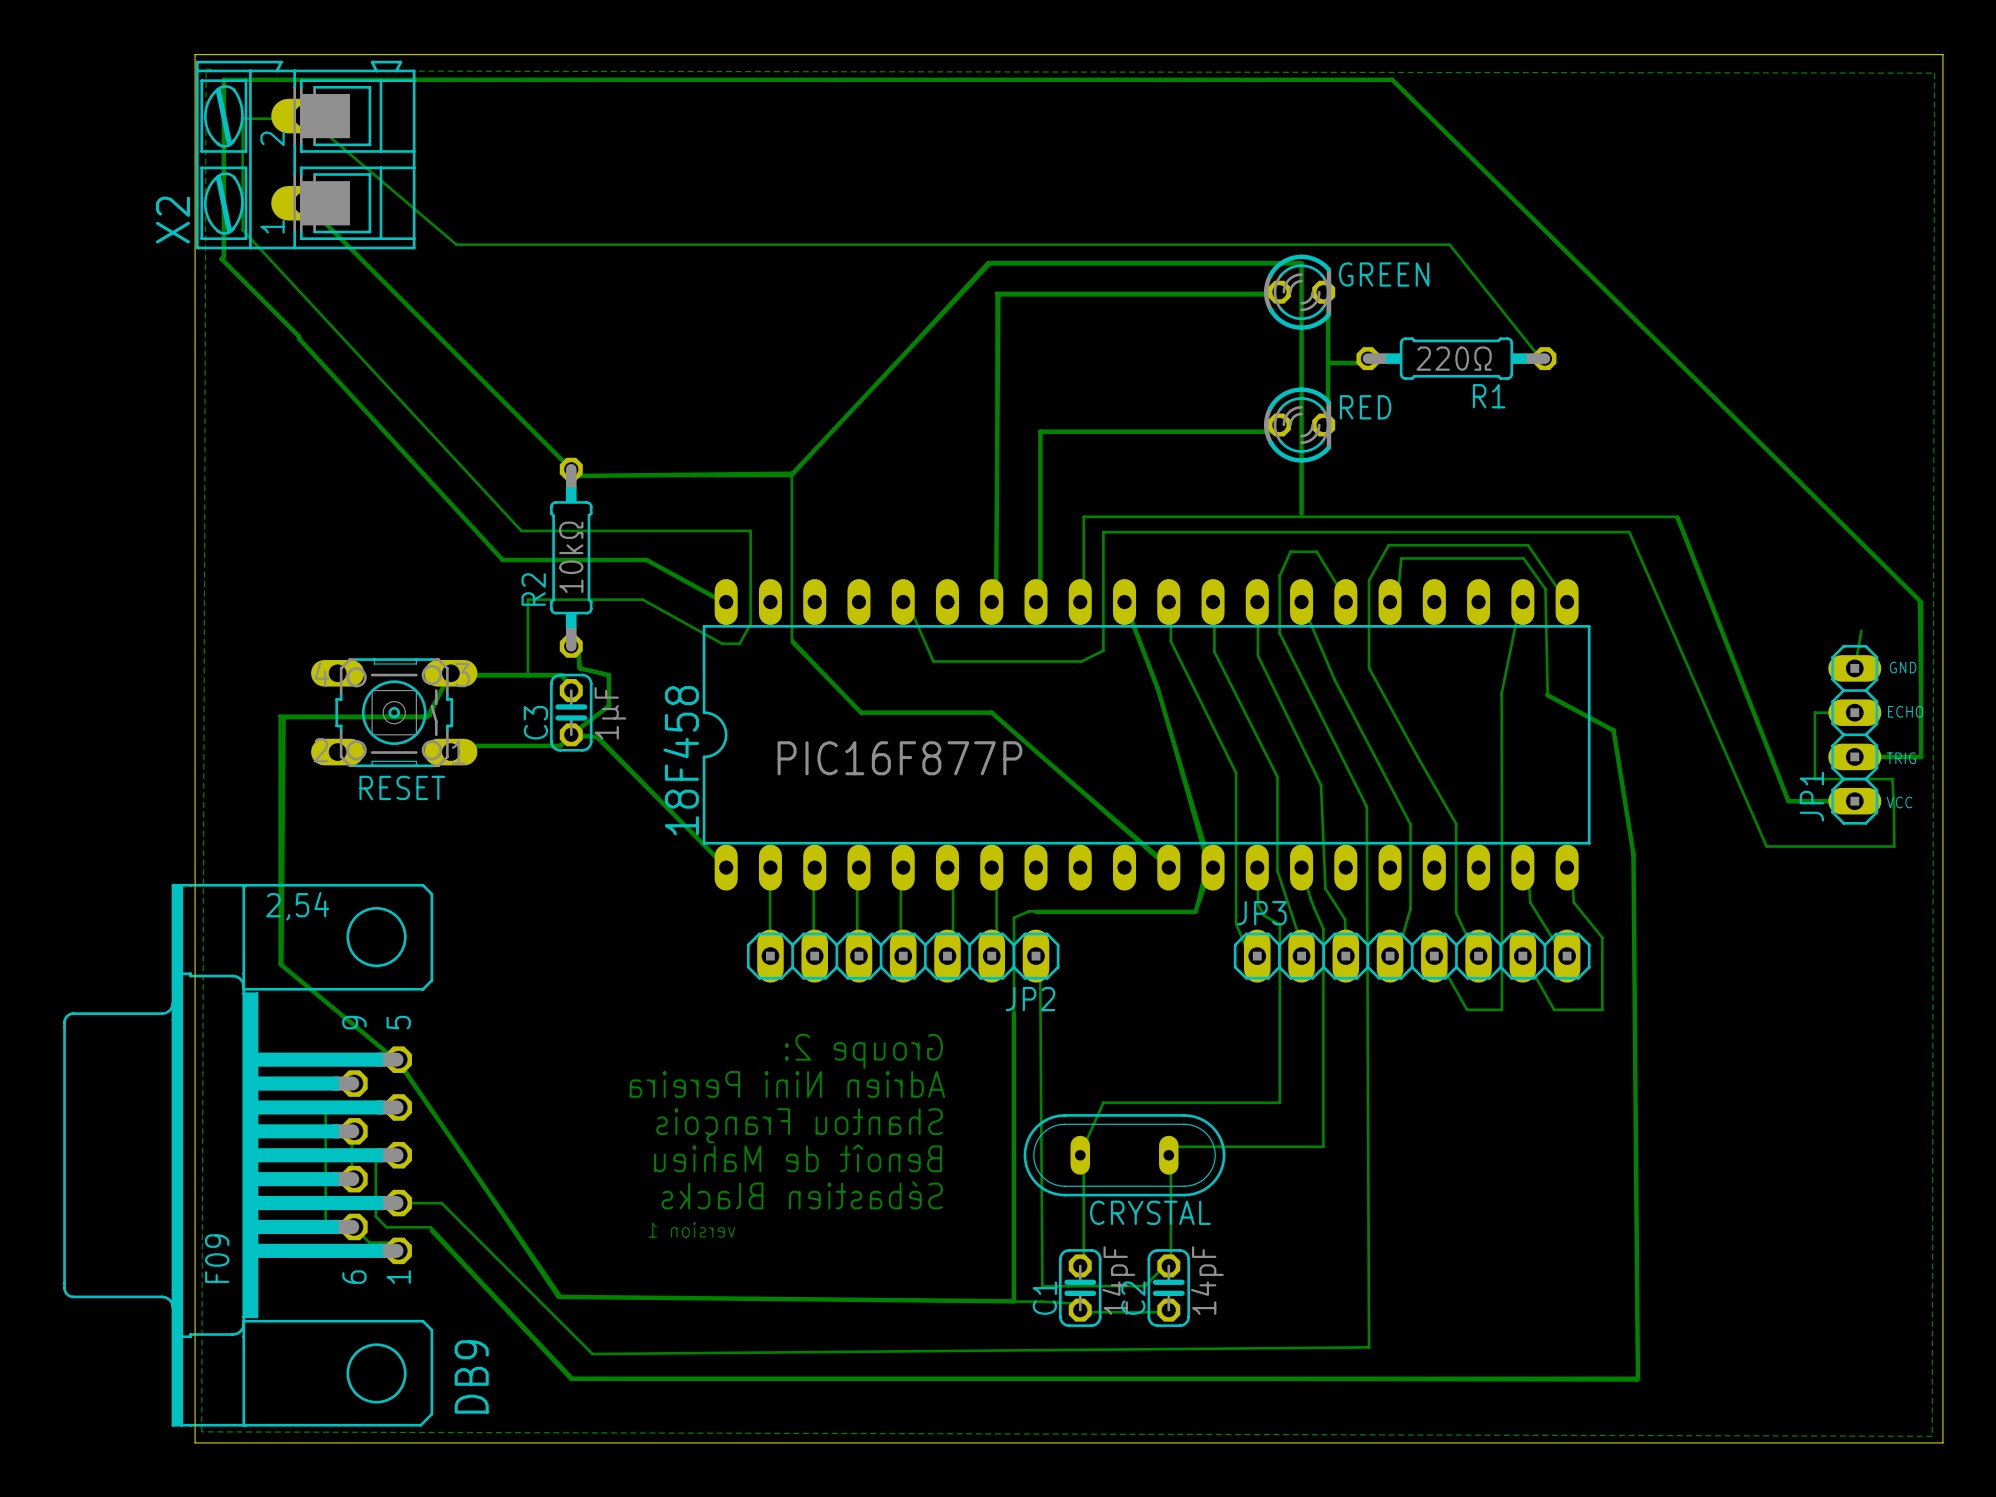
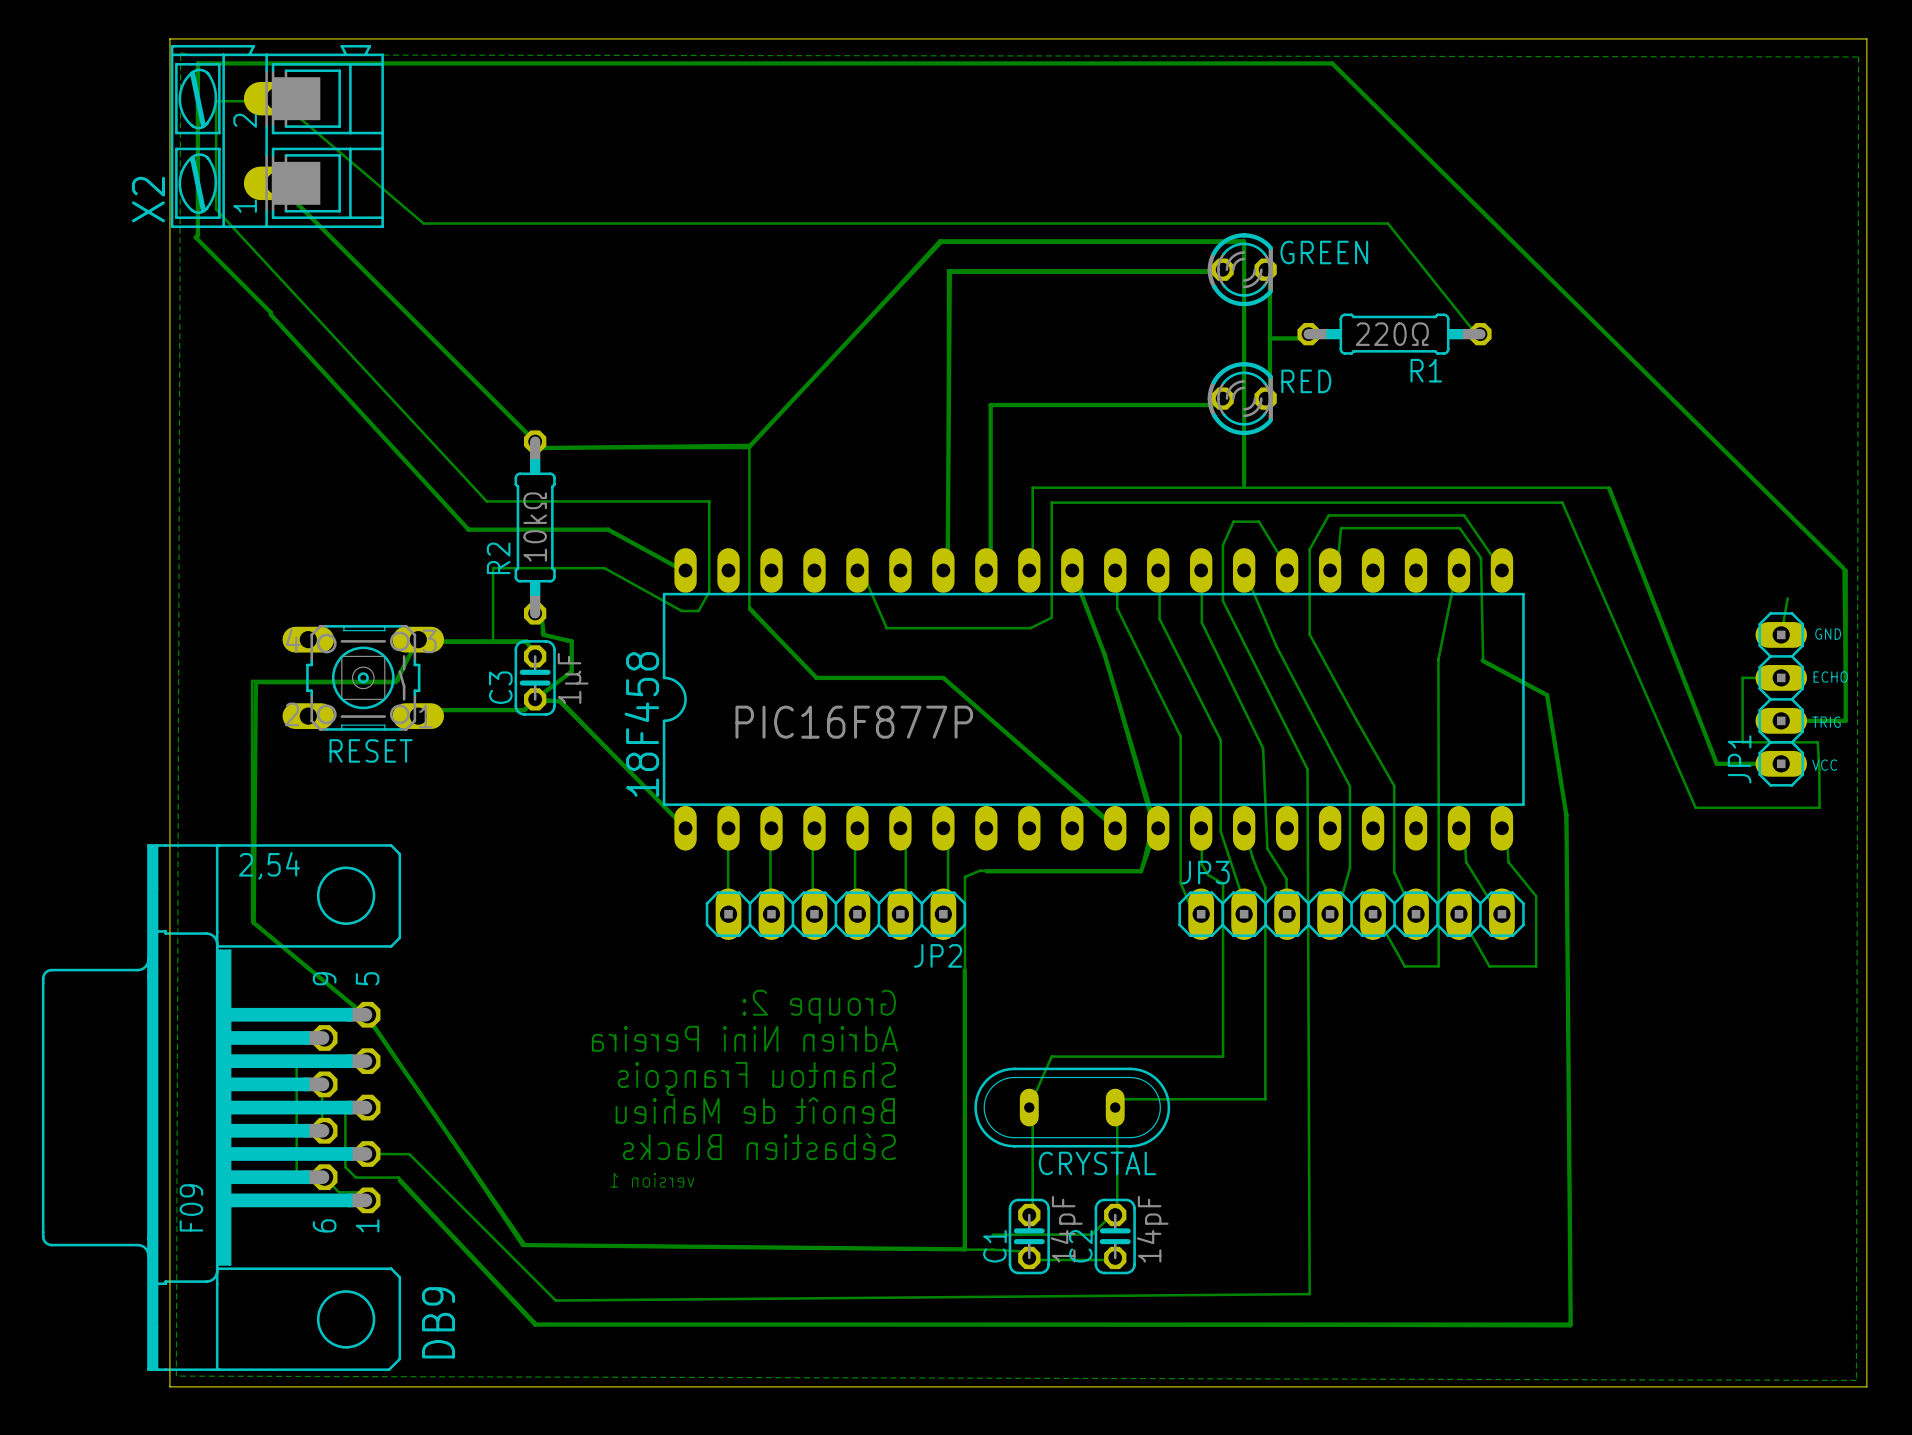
JP2 footprint: [746, 929, 1060, 983] -> [705, 888, 967, 941]
bottom track: (1036, 956) (1040, 963) (1042, 1286) -> none

